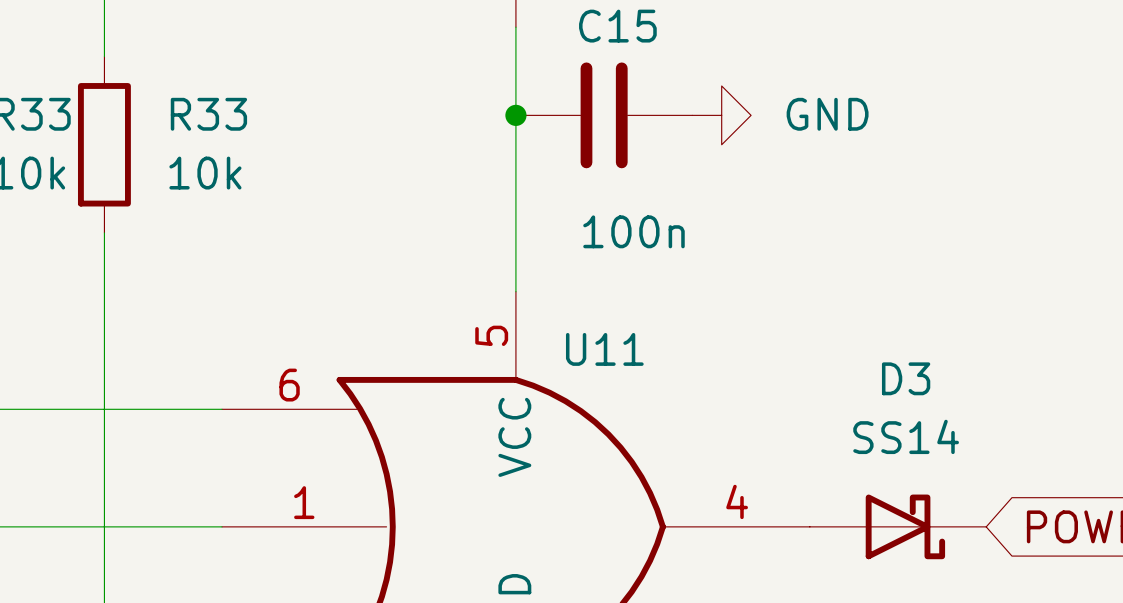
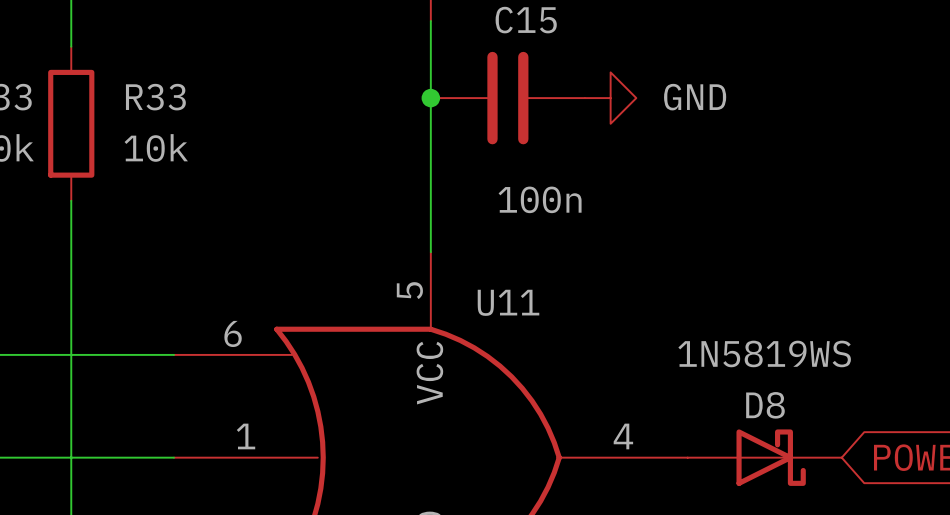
D3 name: D3 (906, 378) -> D8 (765, 405)
D3 value: SS14 (906, 436) -> 1N5819WS (764, 353)

